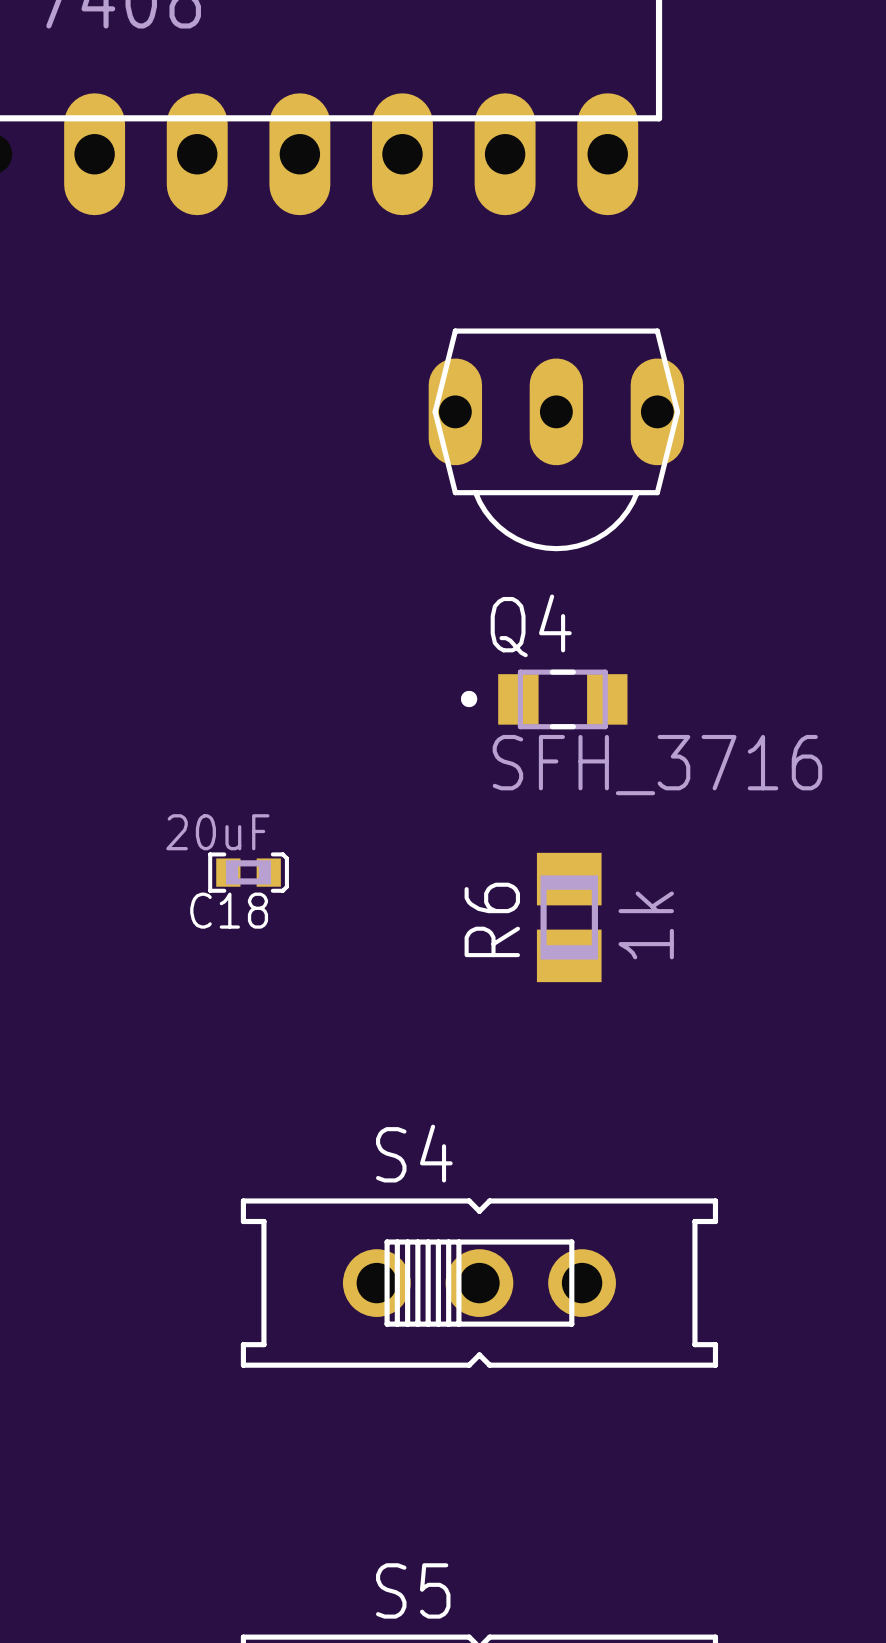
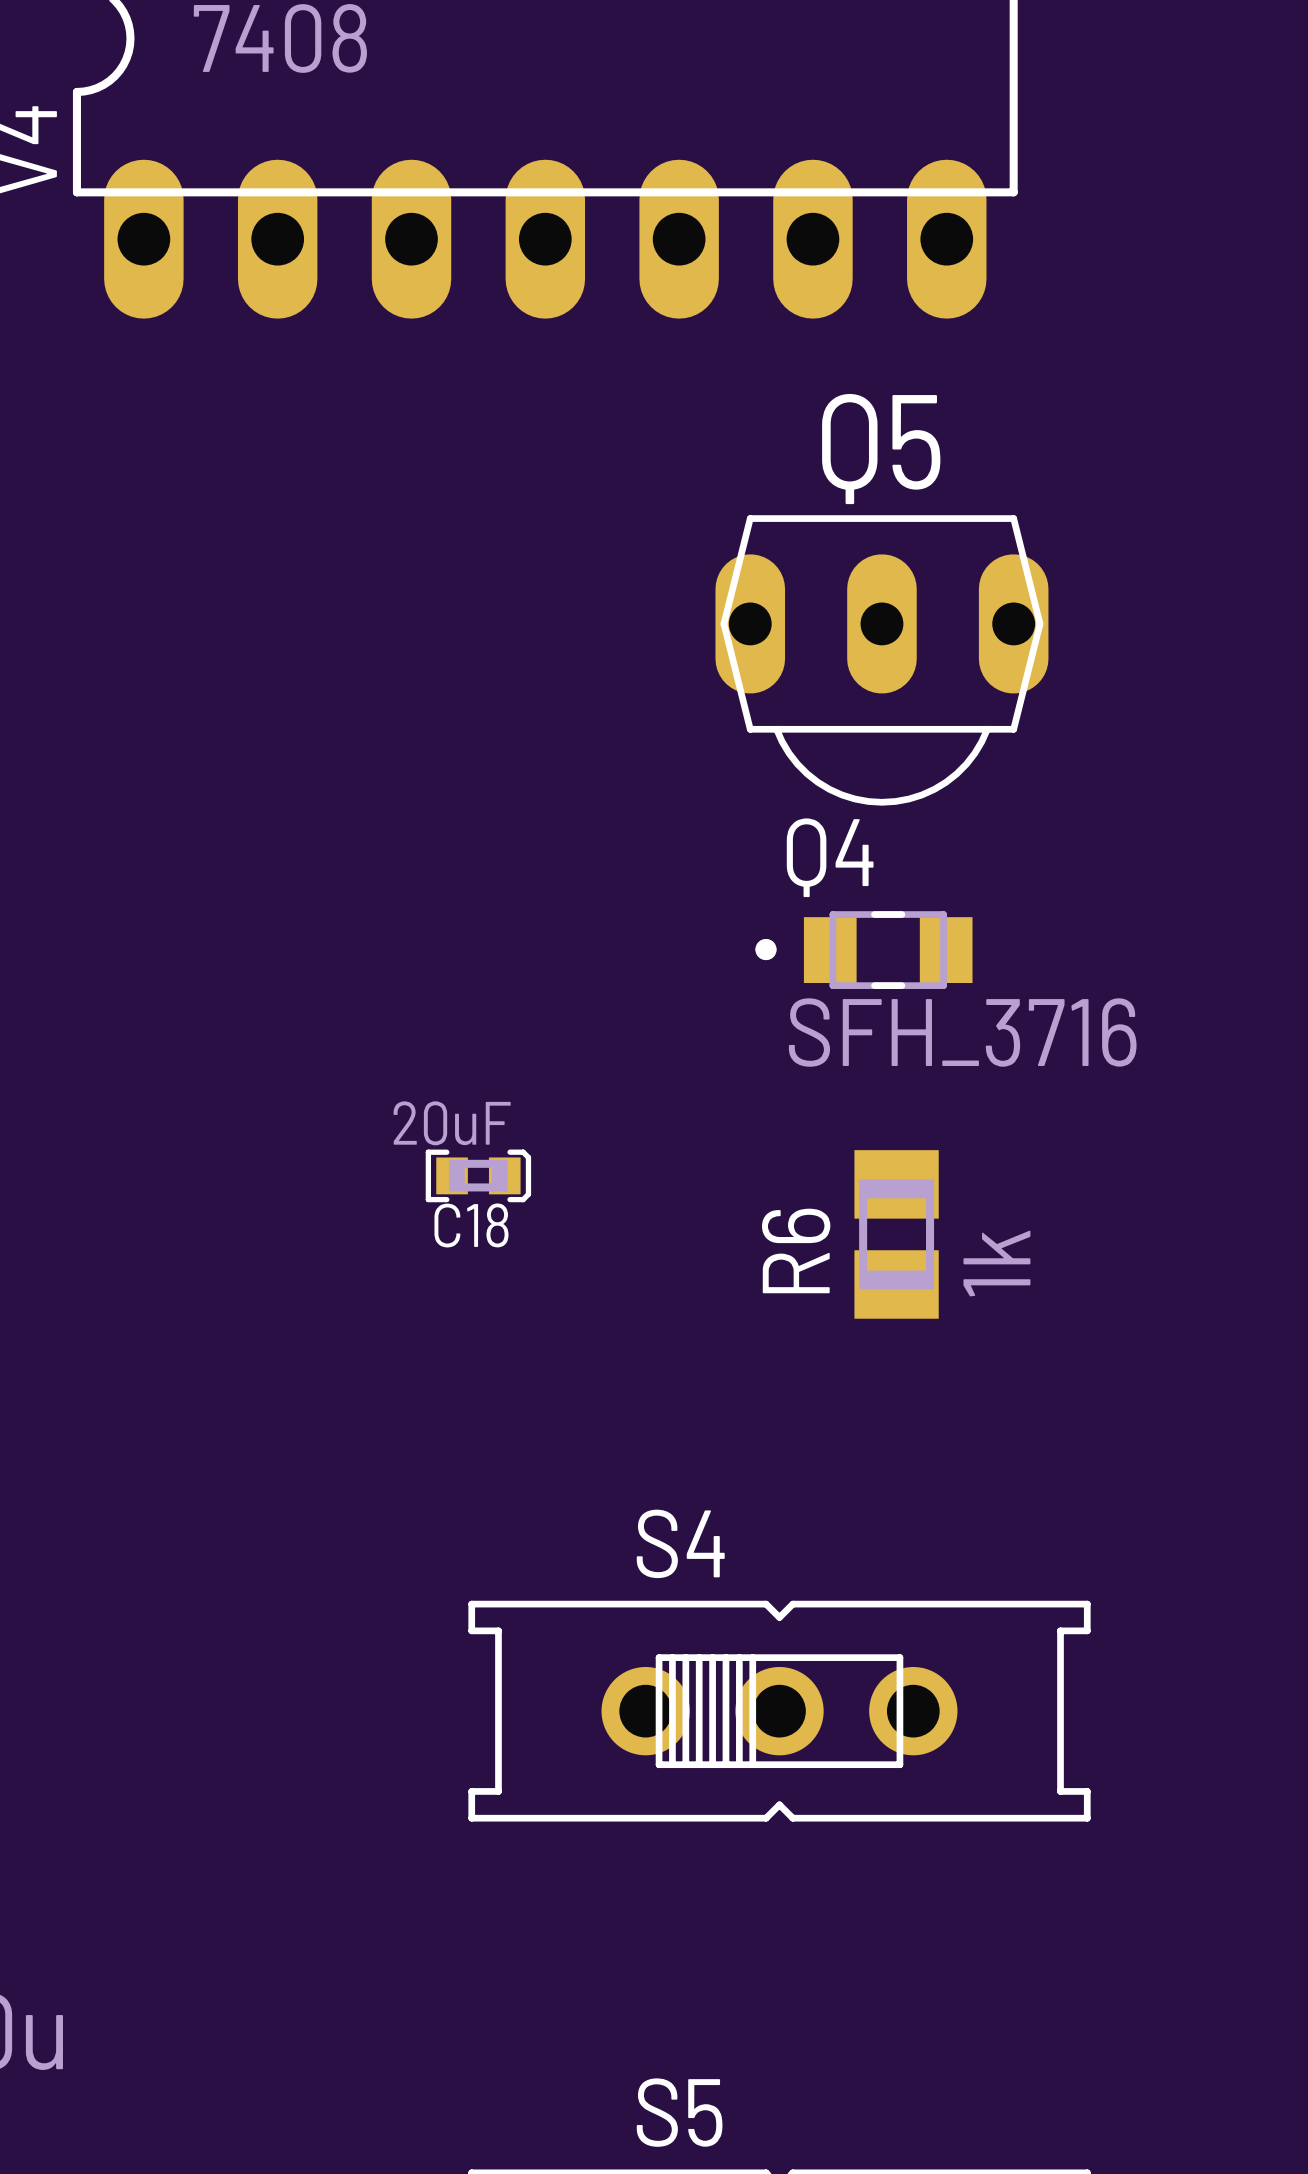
part text: none -> Q5 (881, 449)
part position: (556, 439) -> (881, 660)

